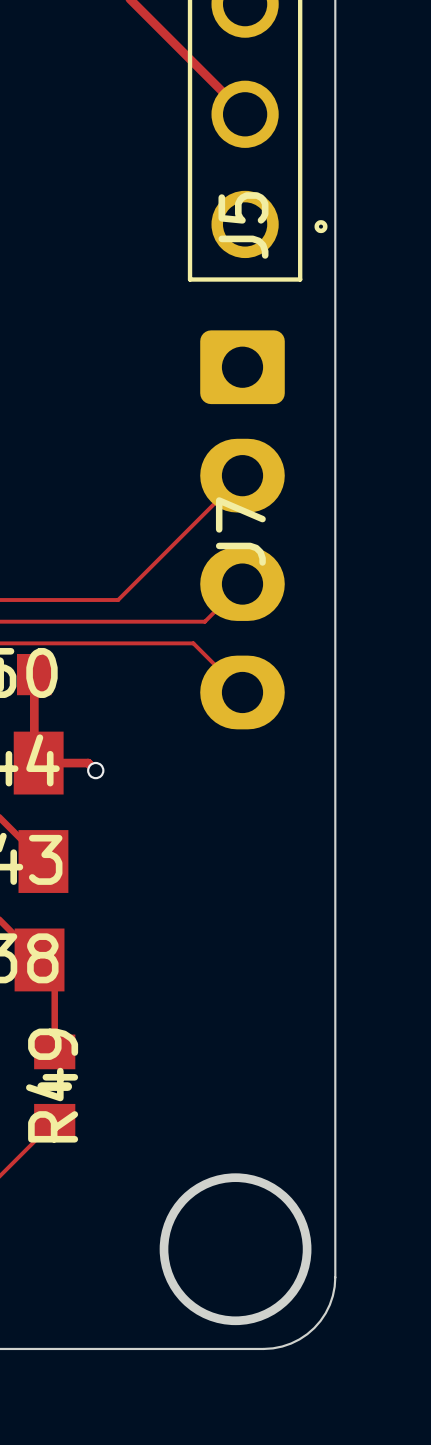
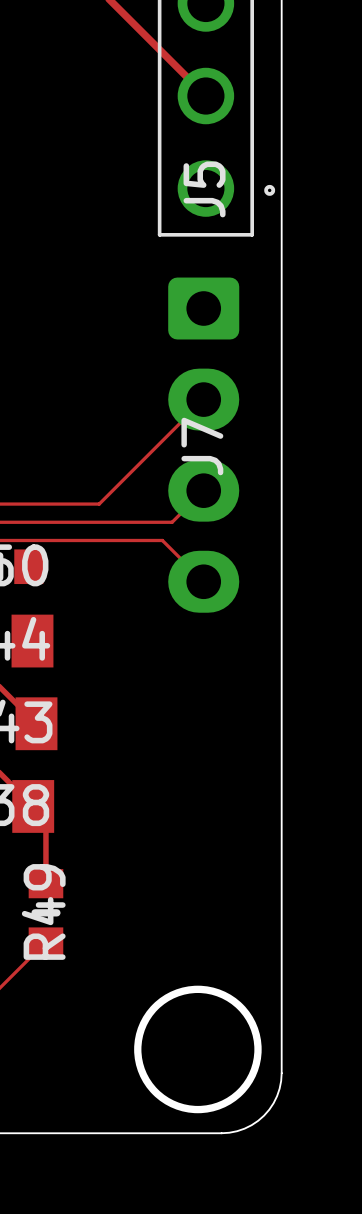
top track: (34, 674) (34, 758) (38, 763) (88, 763) (95, 770) -> none
via: (95, 770) -> none

